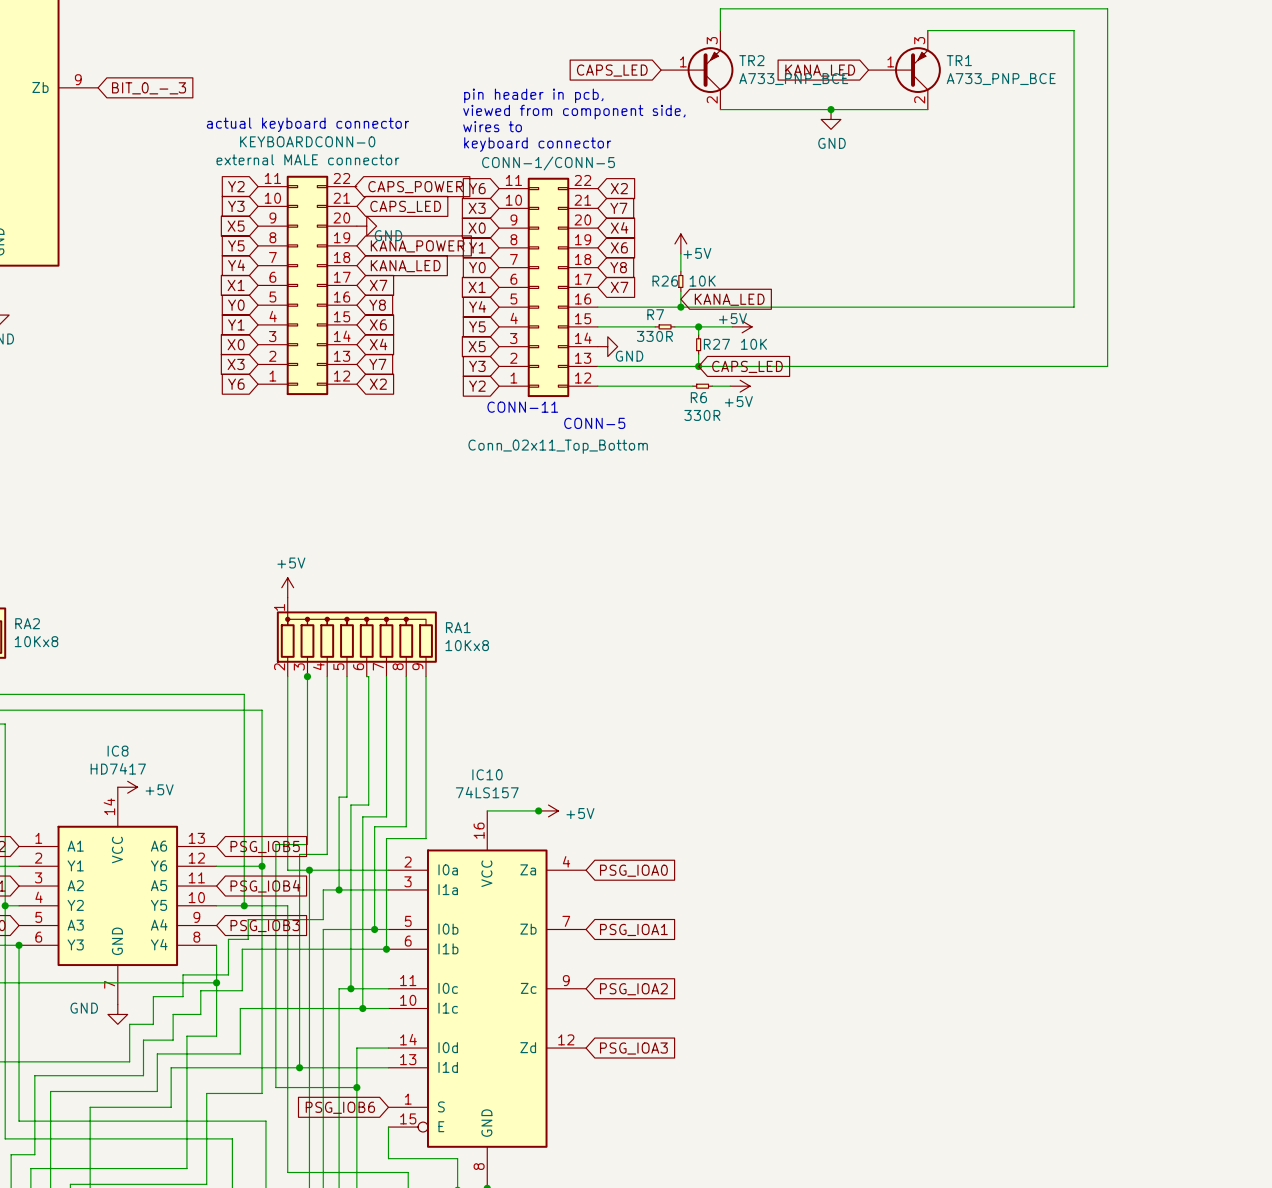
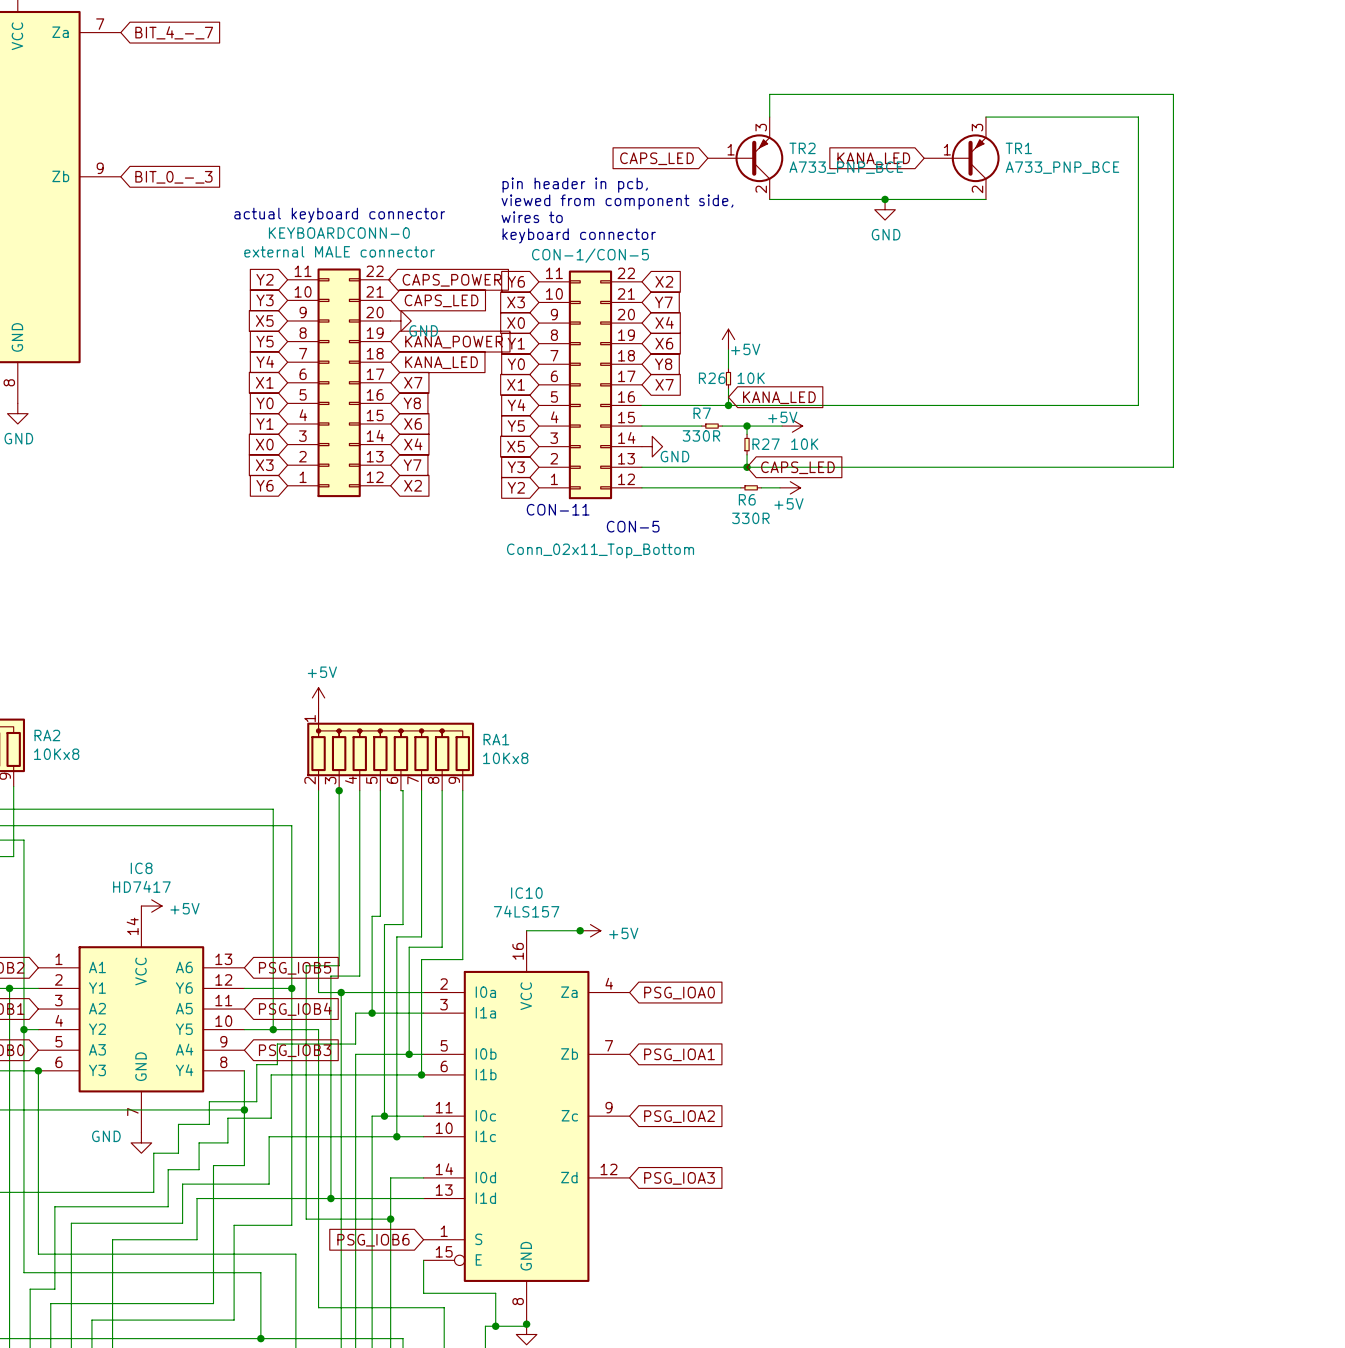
CONN-1/CONN-5 name: CONN-1/CONN-5 (548, 163) -> CON-1/CON-5 (590, 255)
text: CONN-11 (522, 407) -> CON-11 (558, 509)
text: CONN-5 (594, 423) -> CON-5 (633, 526)

